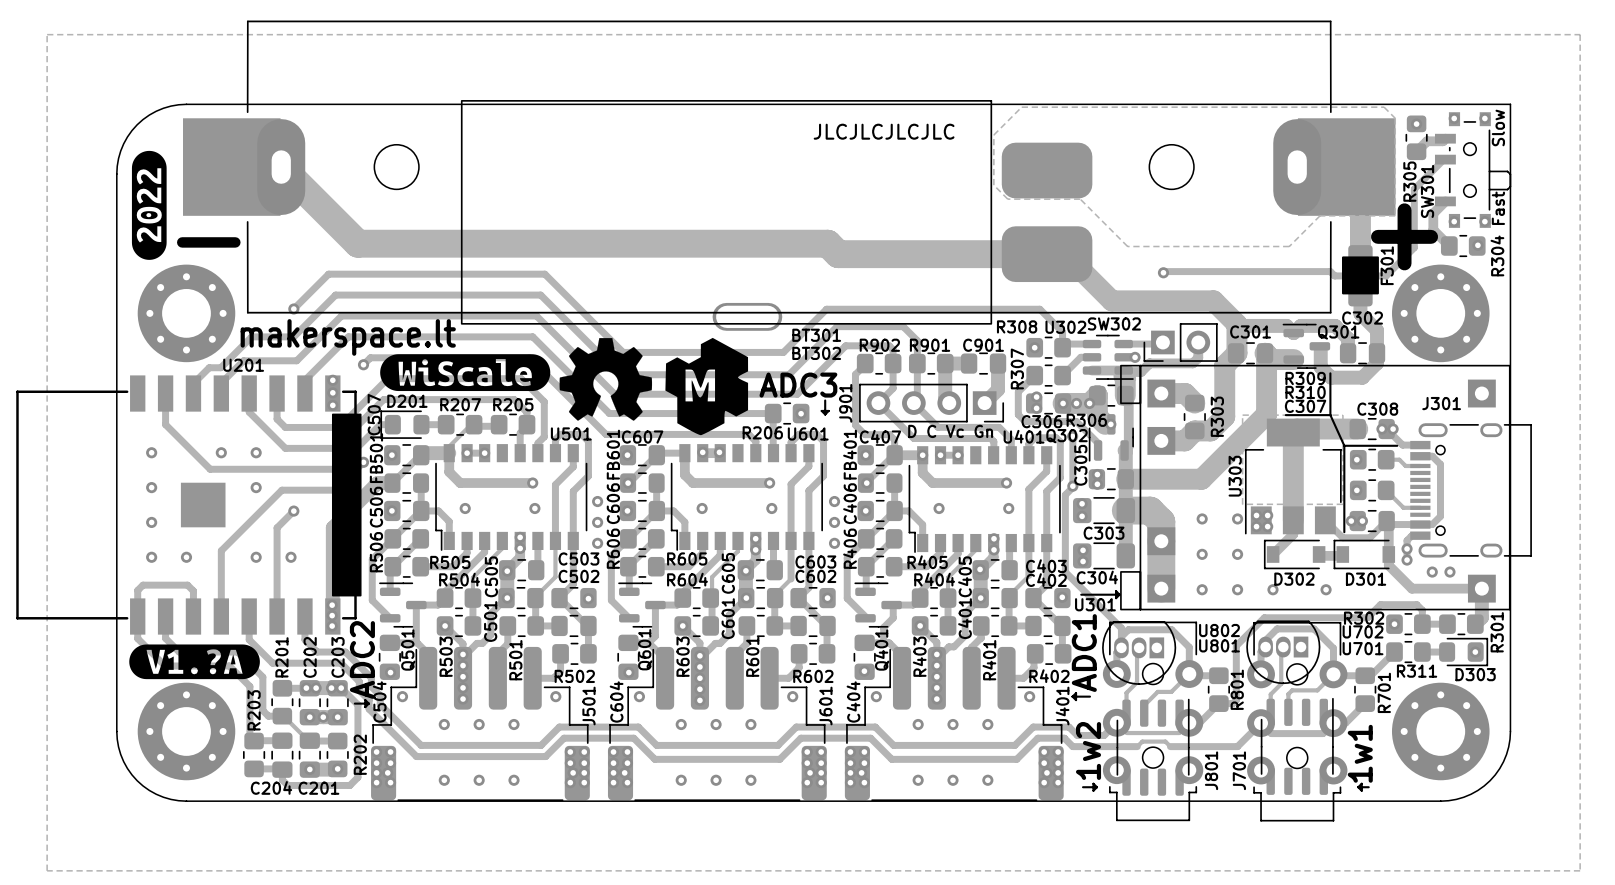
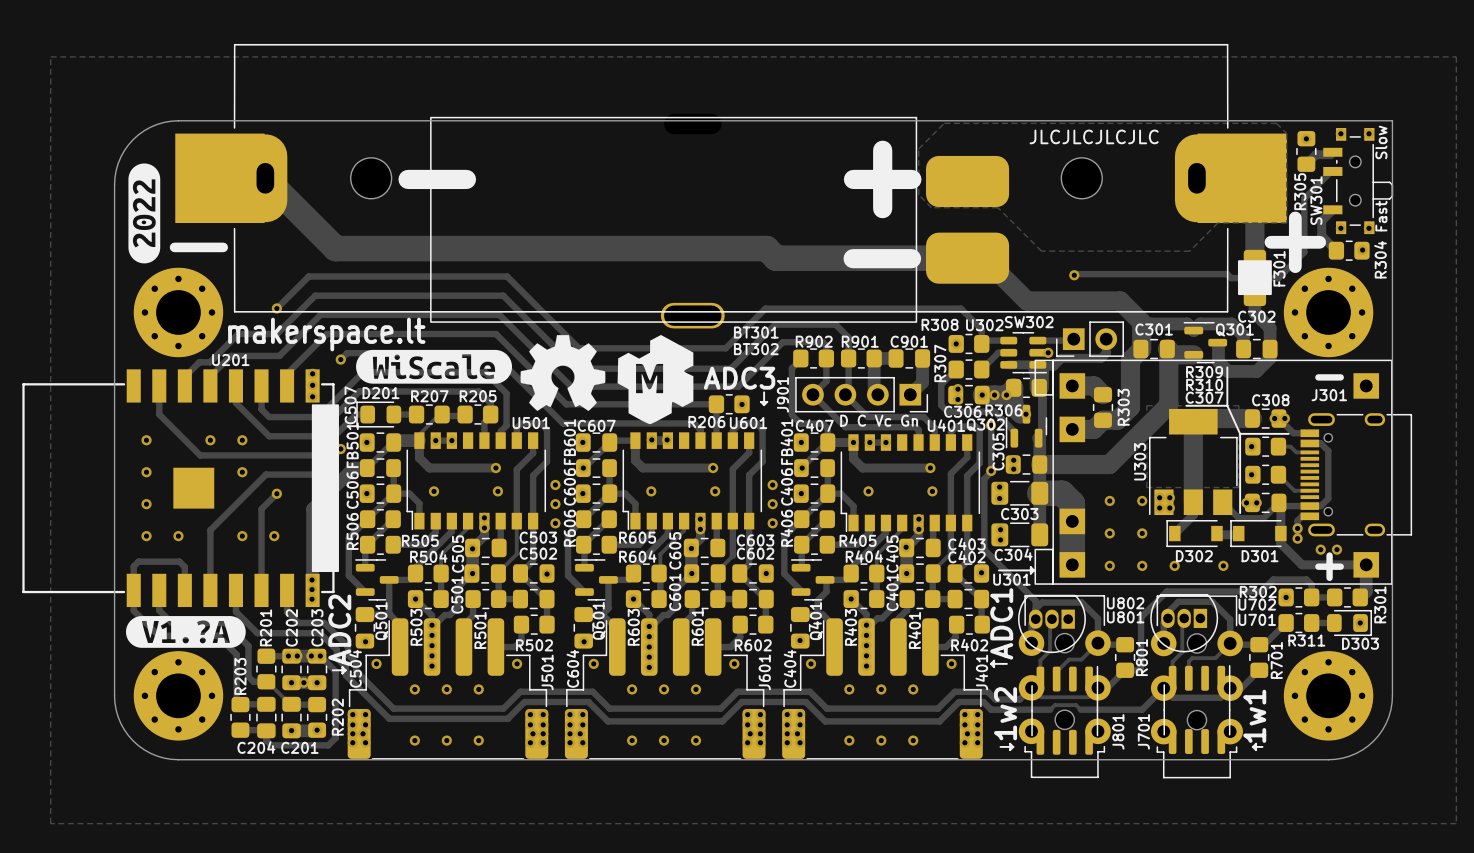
text position: JLCJLCJLCJLC (884, 131) -> JLCJLCJLCJLC (1094, 136)
text: none -> - + (659, 179)
text: none -> - (882, 258)
text: none -> - (1329, 377)
text: none -> + (1329, 566)

